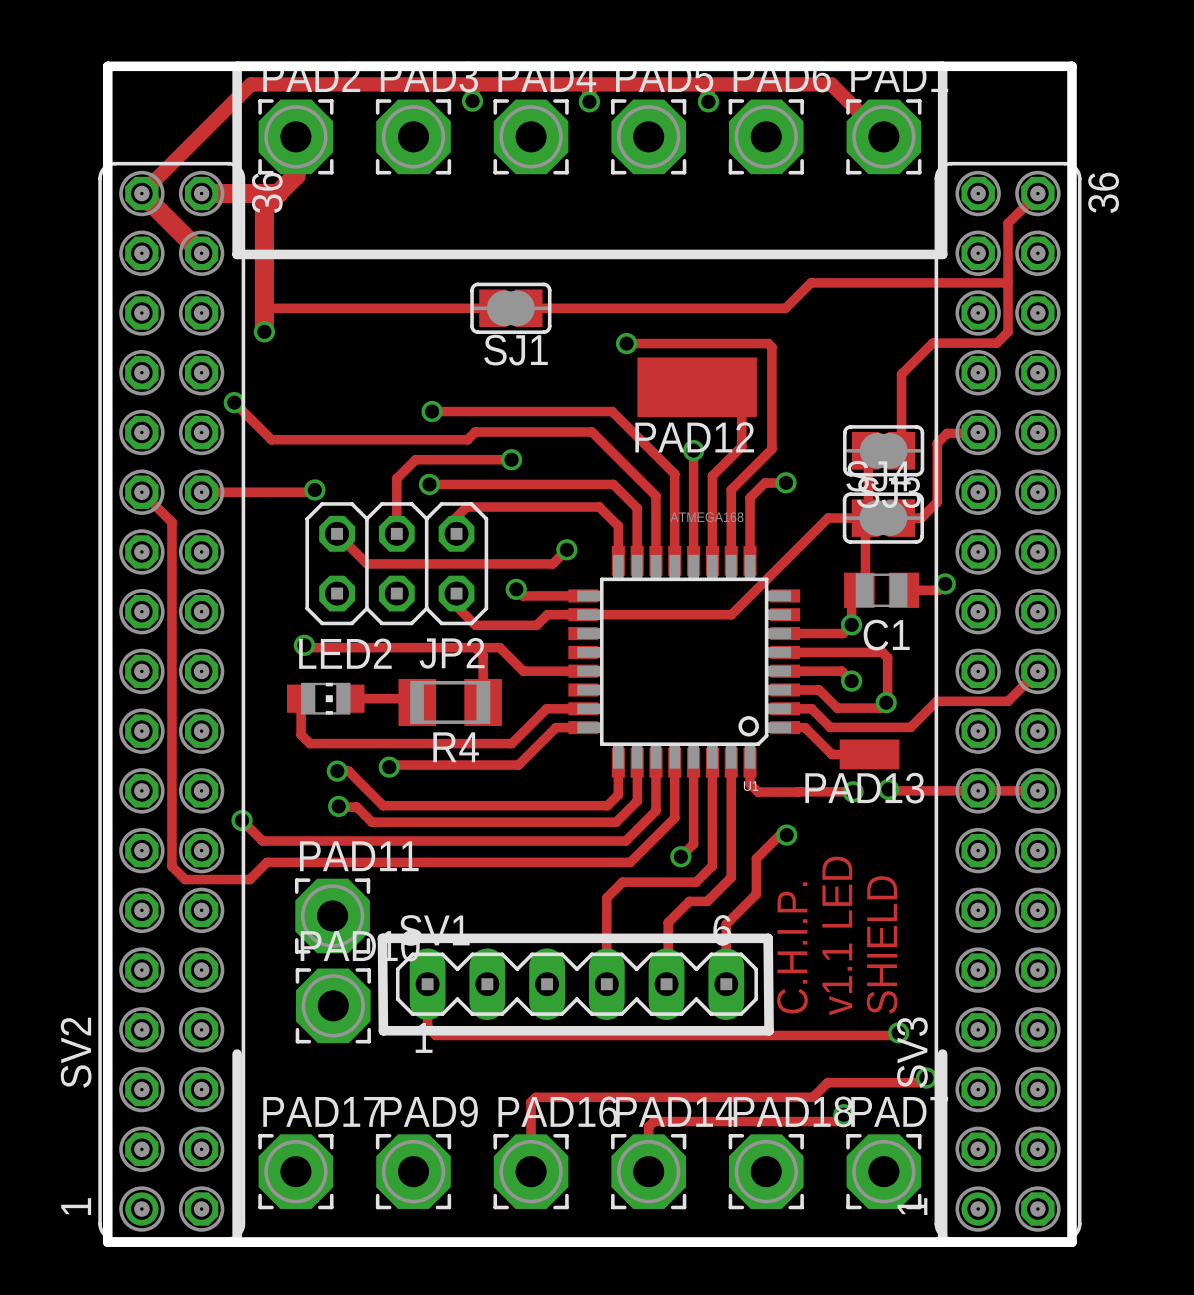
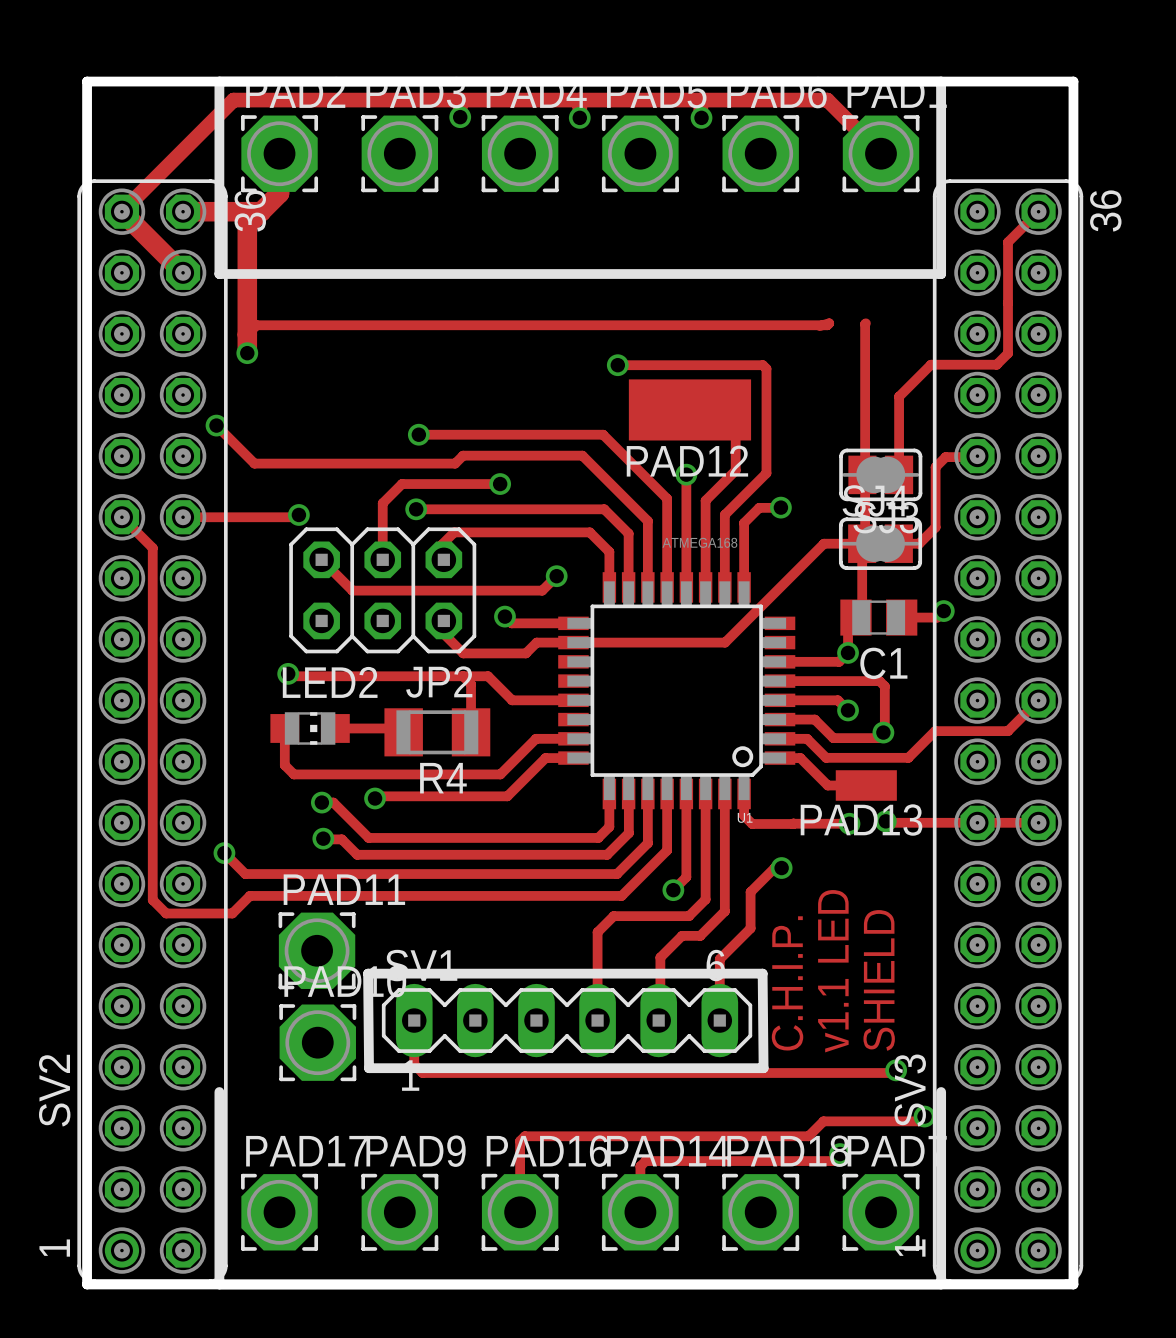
track: (1007, 282) (810, 282) (785, 308) (528, 308) -> none
track: none -> (865, 323) (865, 477)
track: (269, 308) (492, 308) -> (252, 329) (256, 325) (827, 325) (829, 323) (819, 325)
SJ1: (510, 308) -> none

